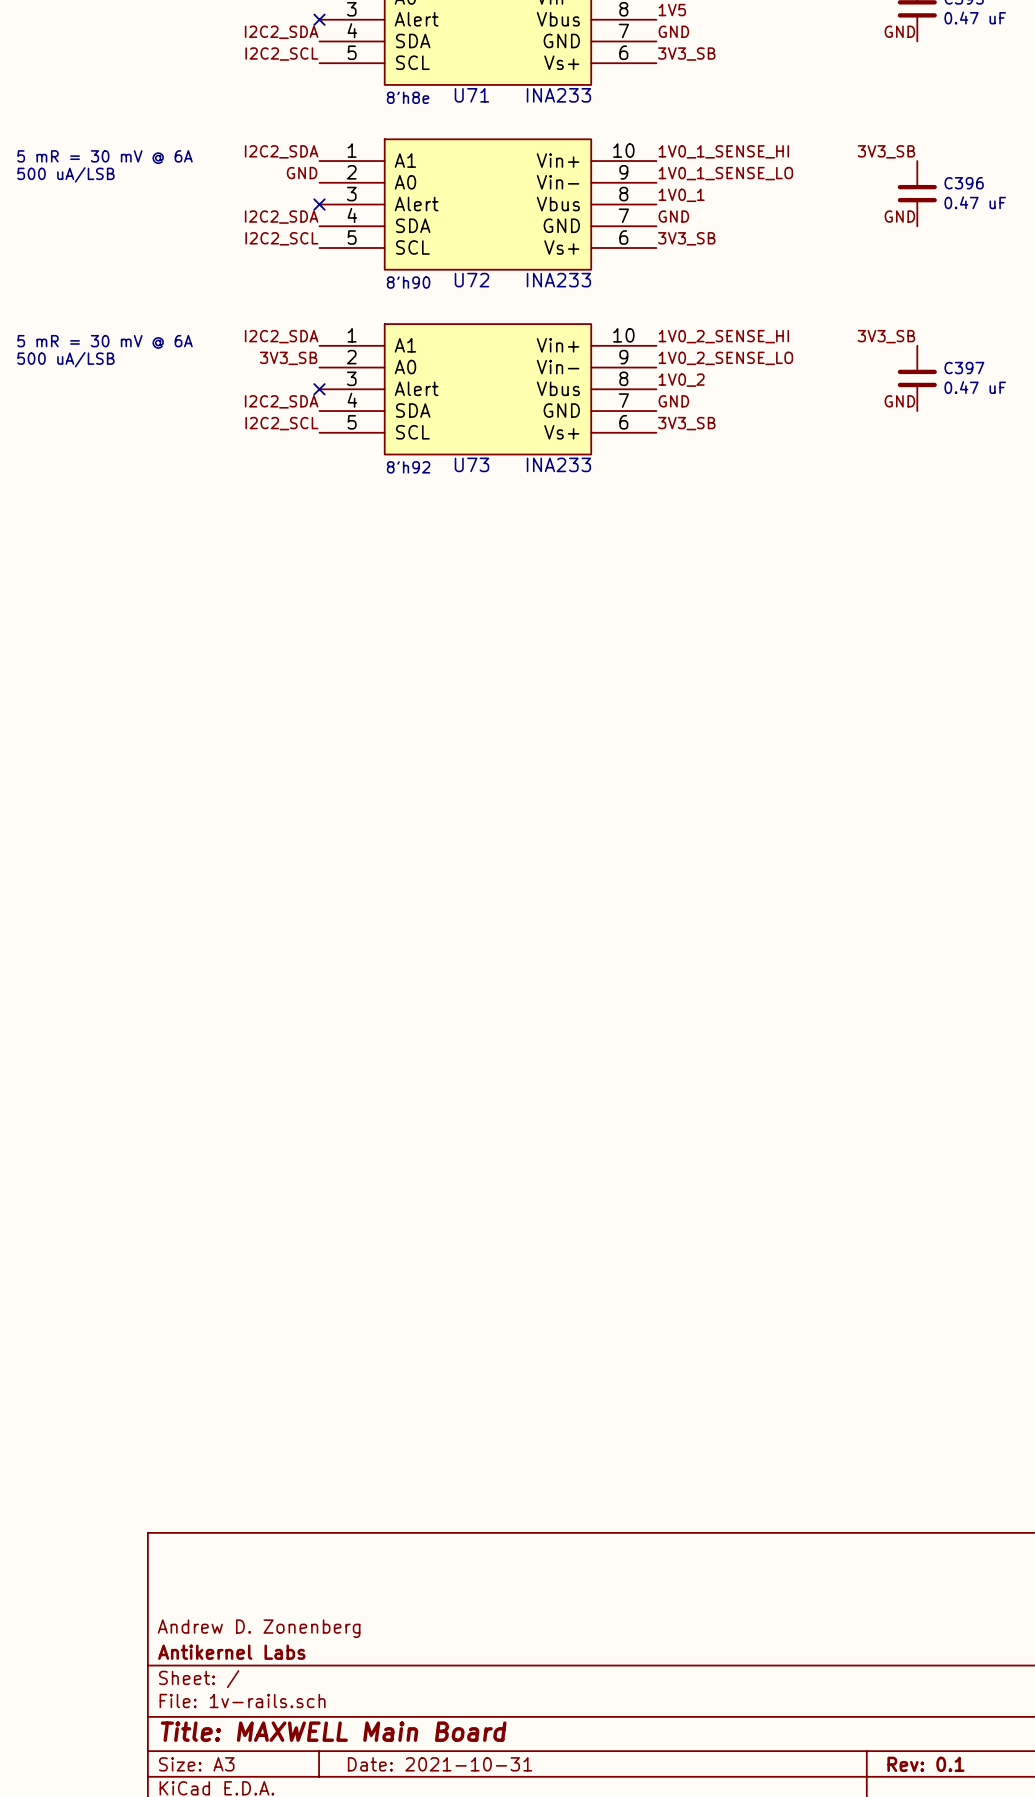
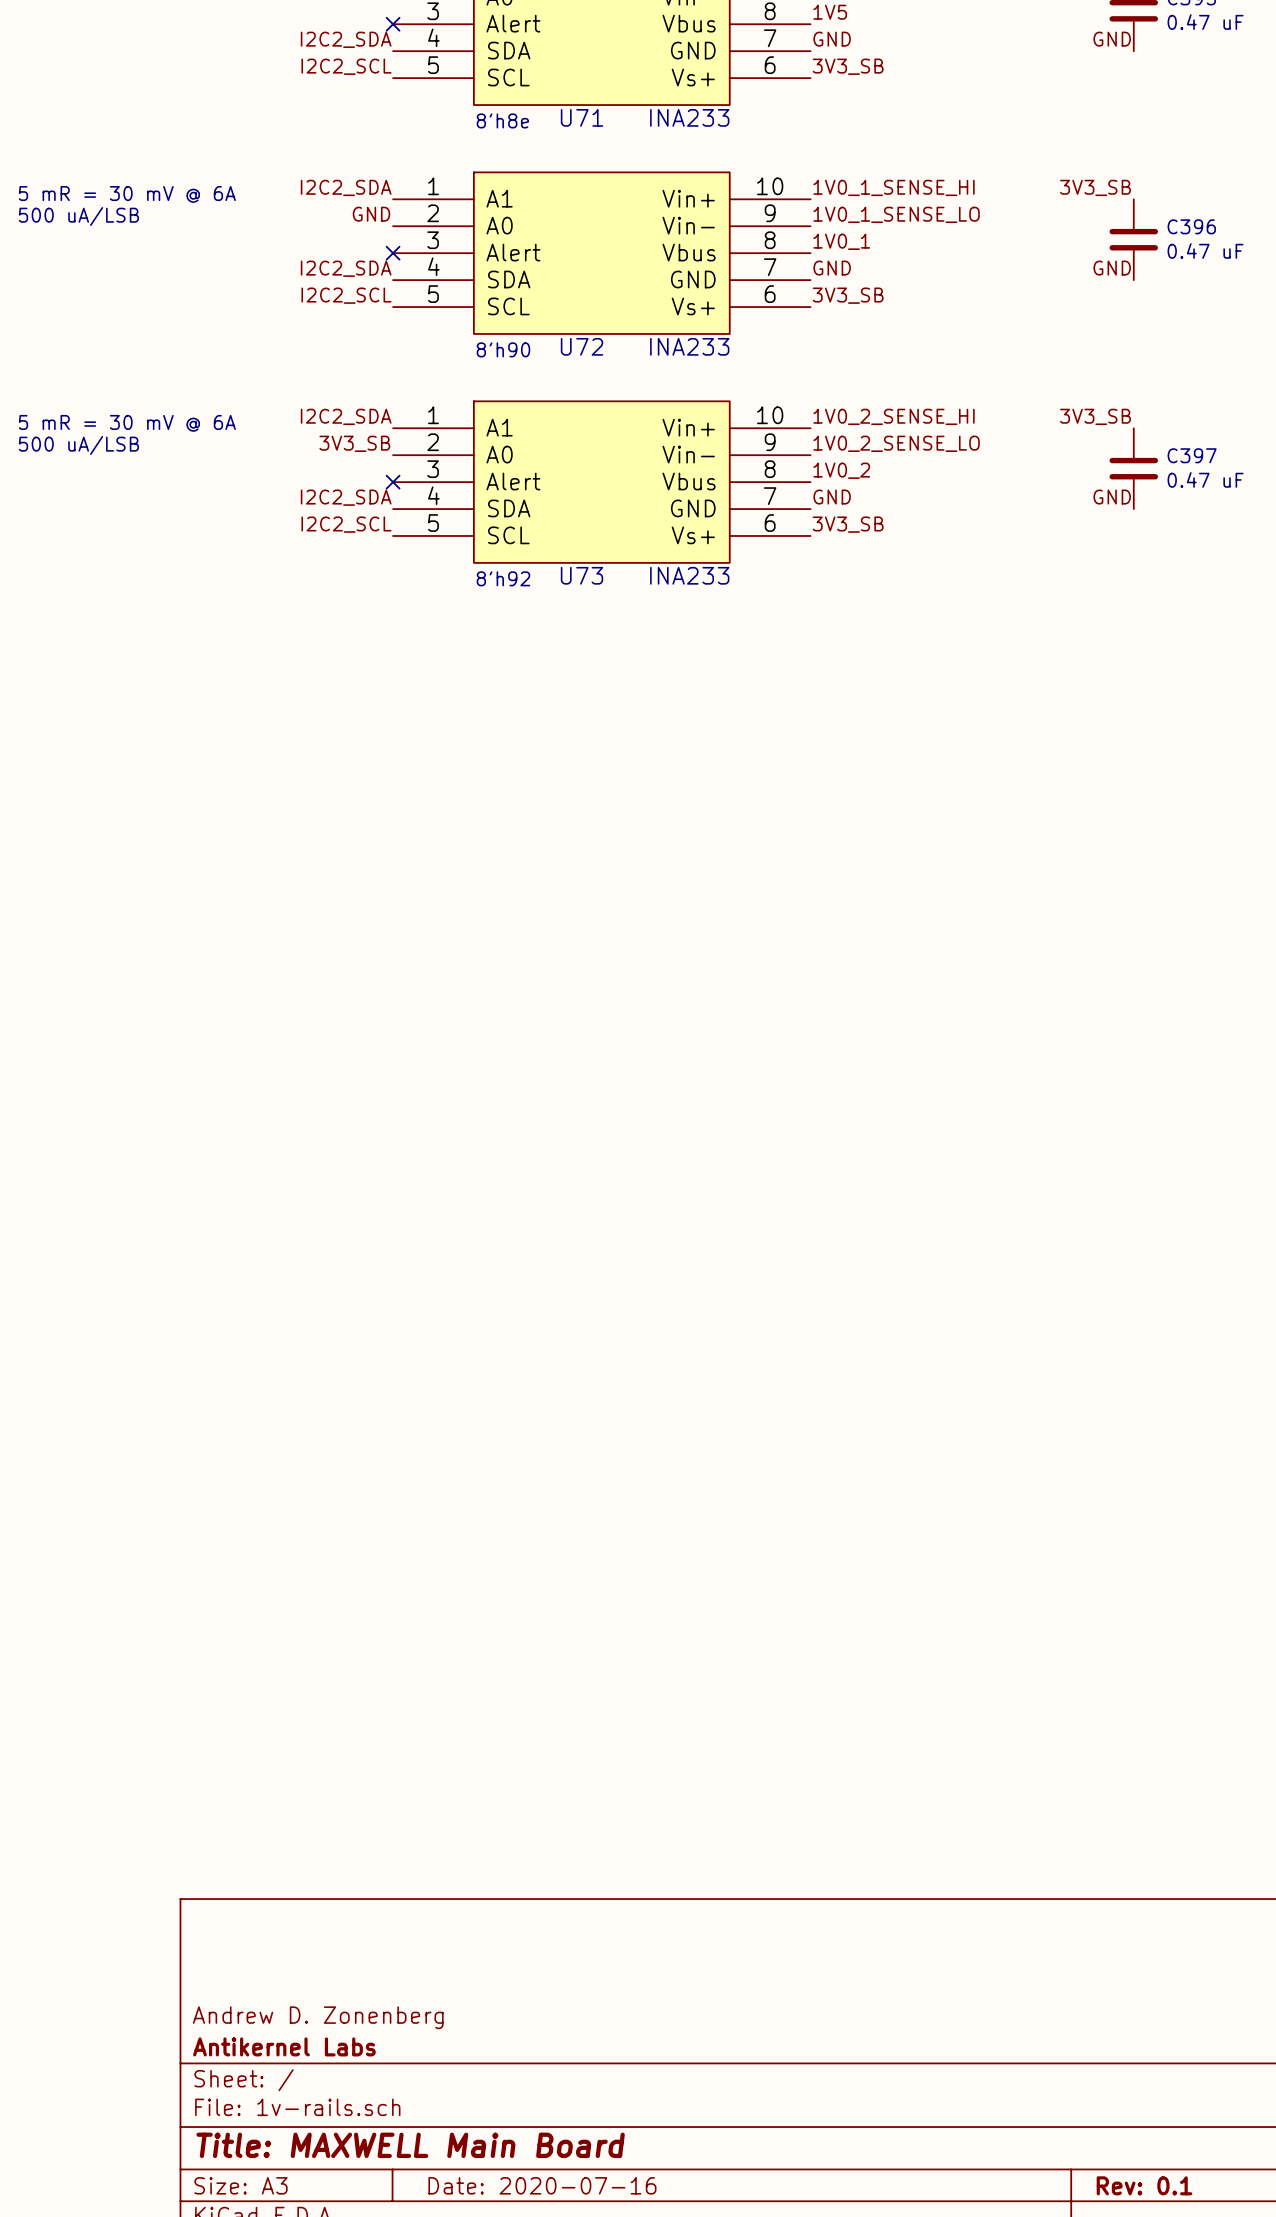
title block: Date: 2021-10-31 (440, 1764) -> Date: 2020-07-16 (542, 2185)

